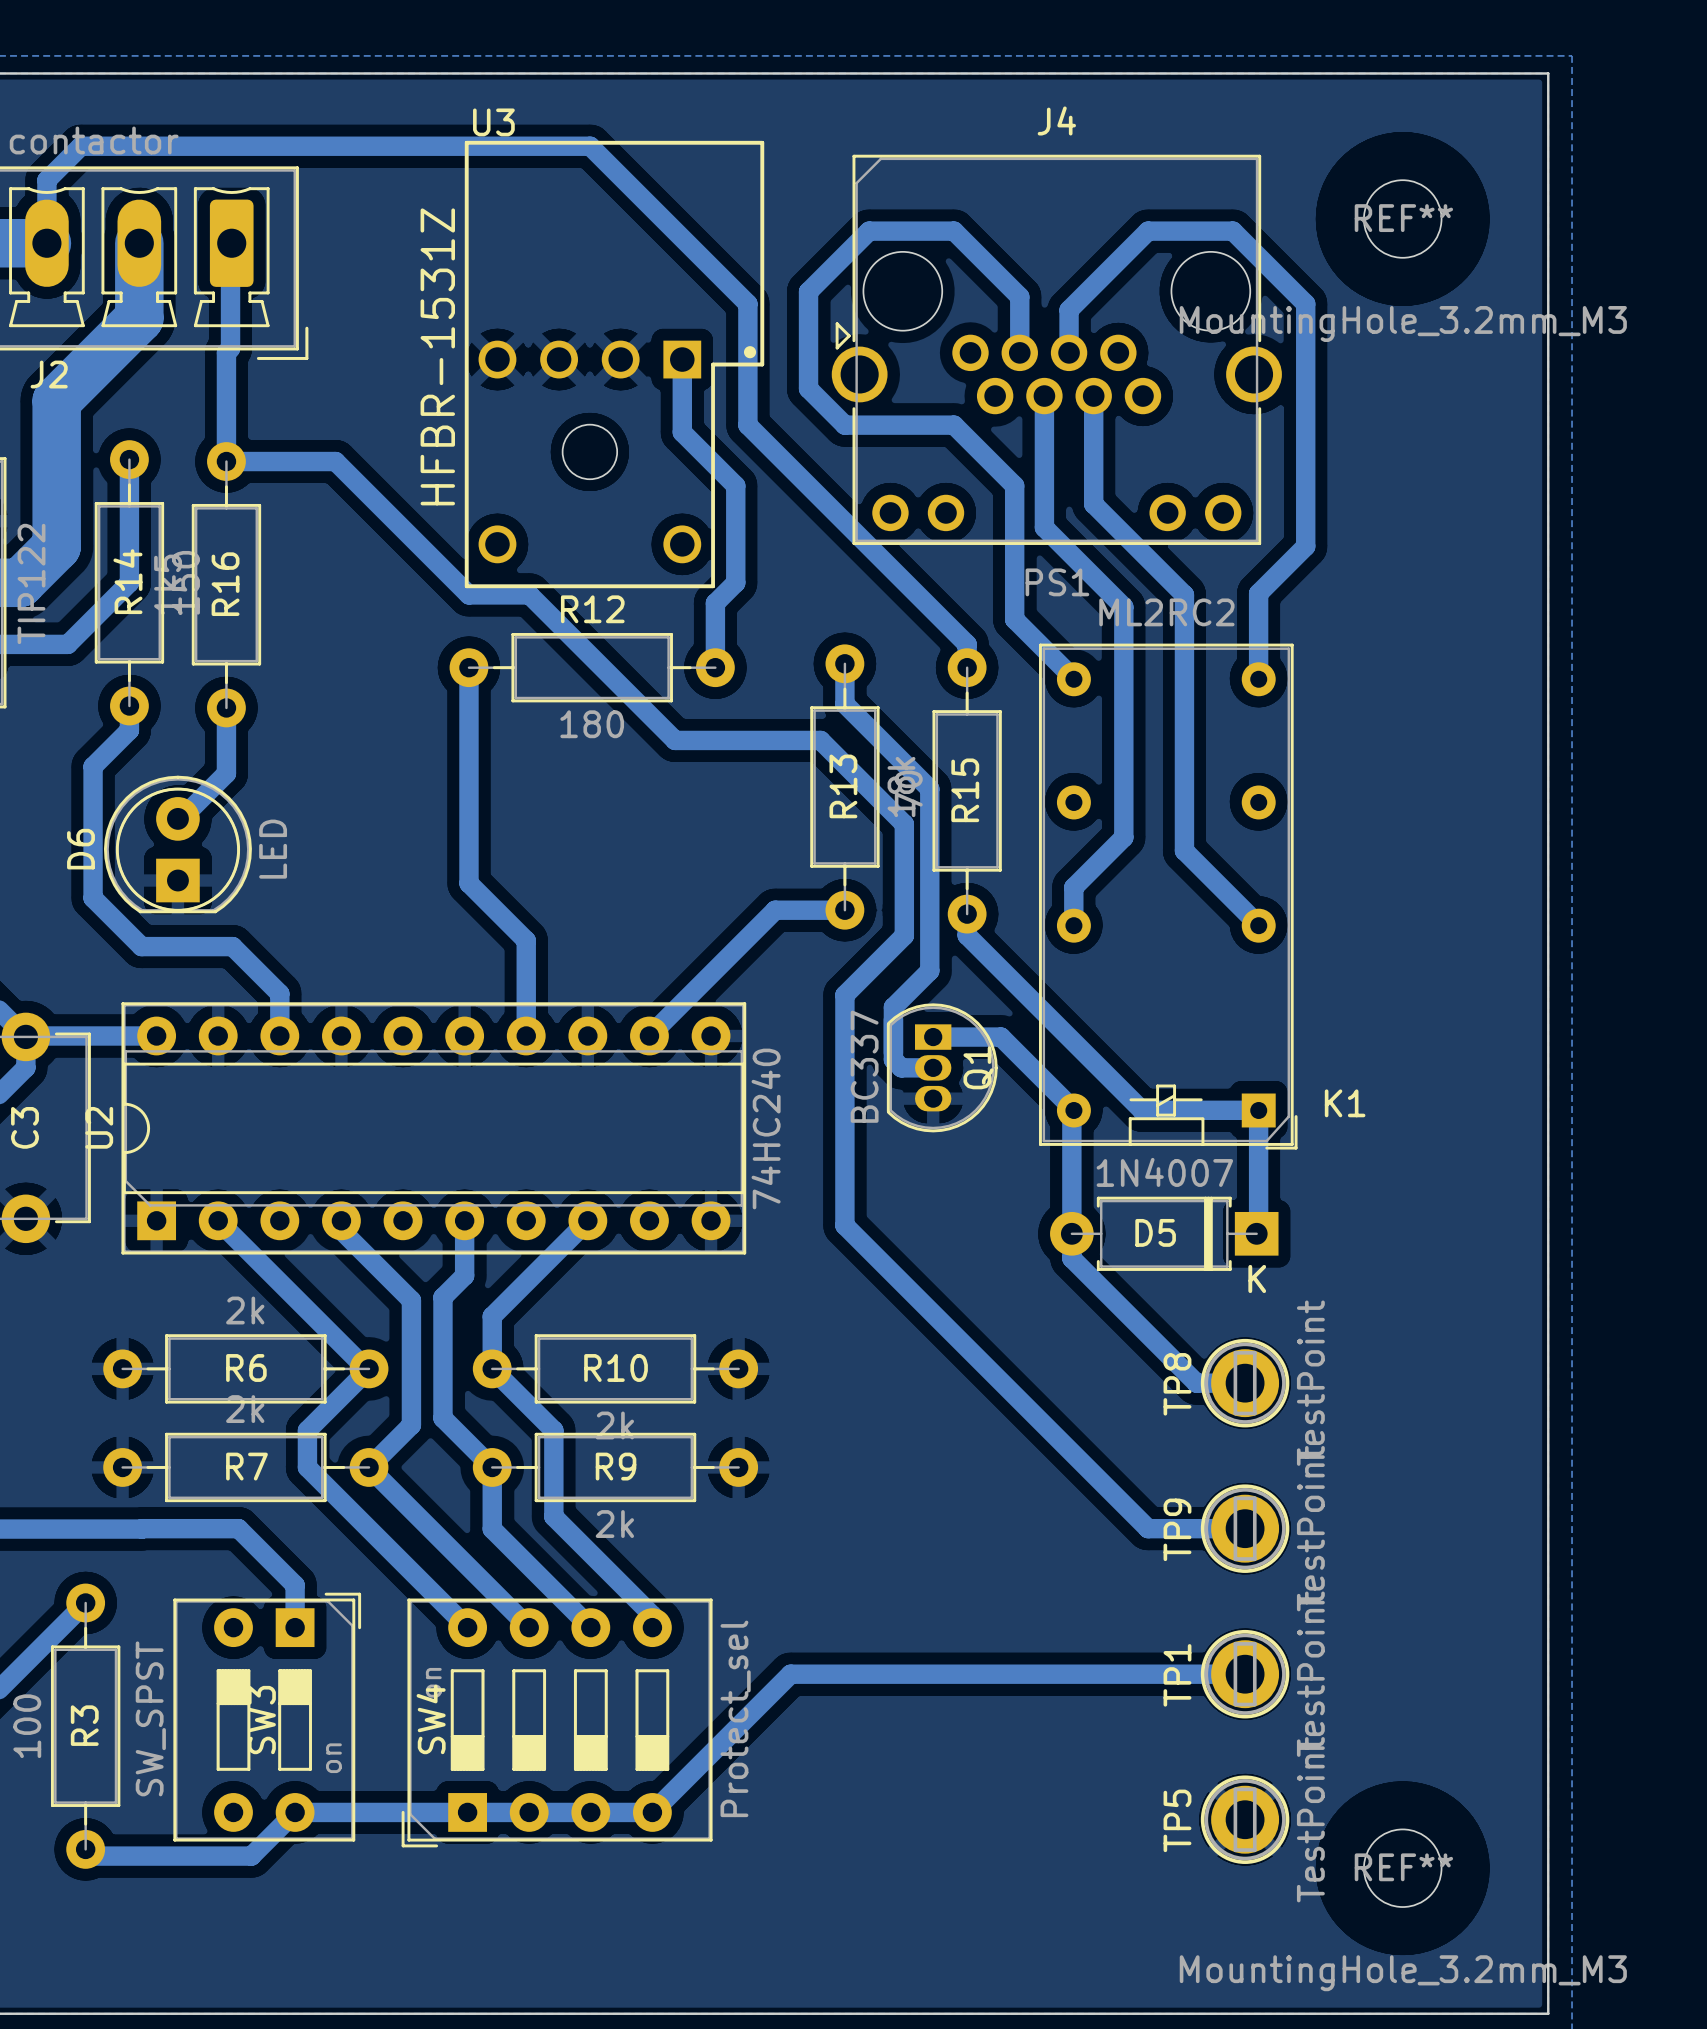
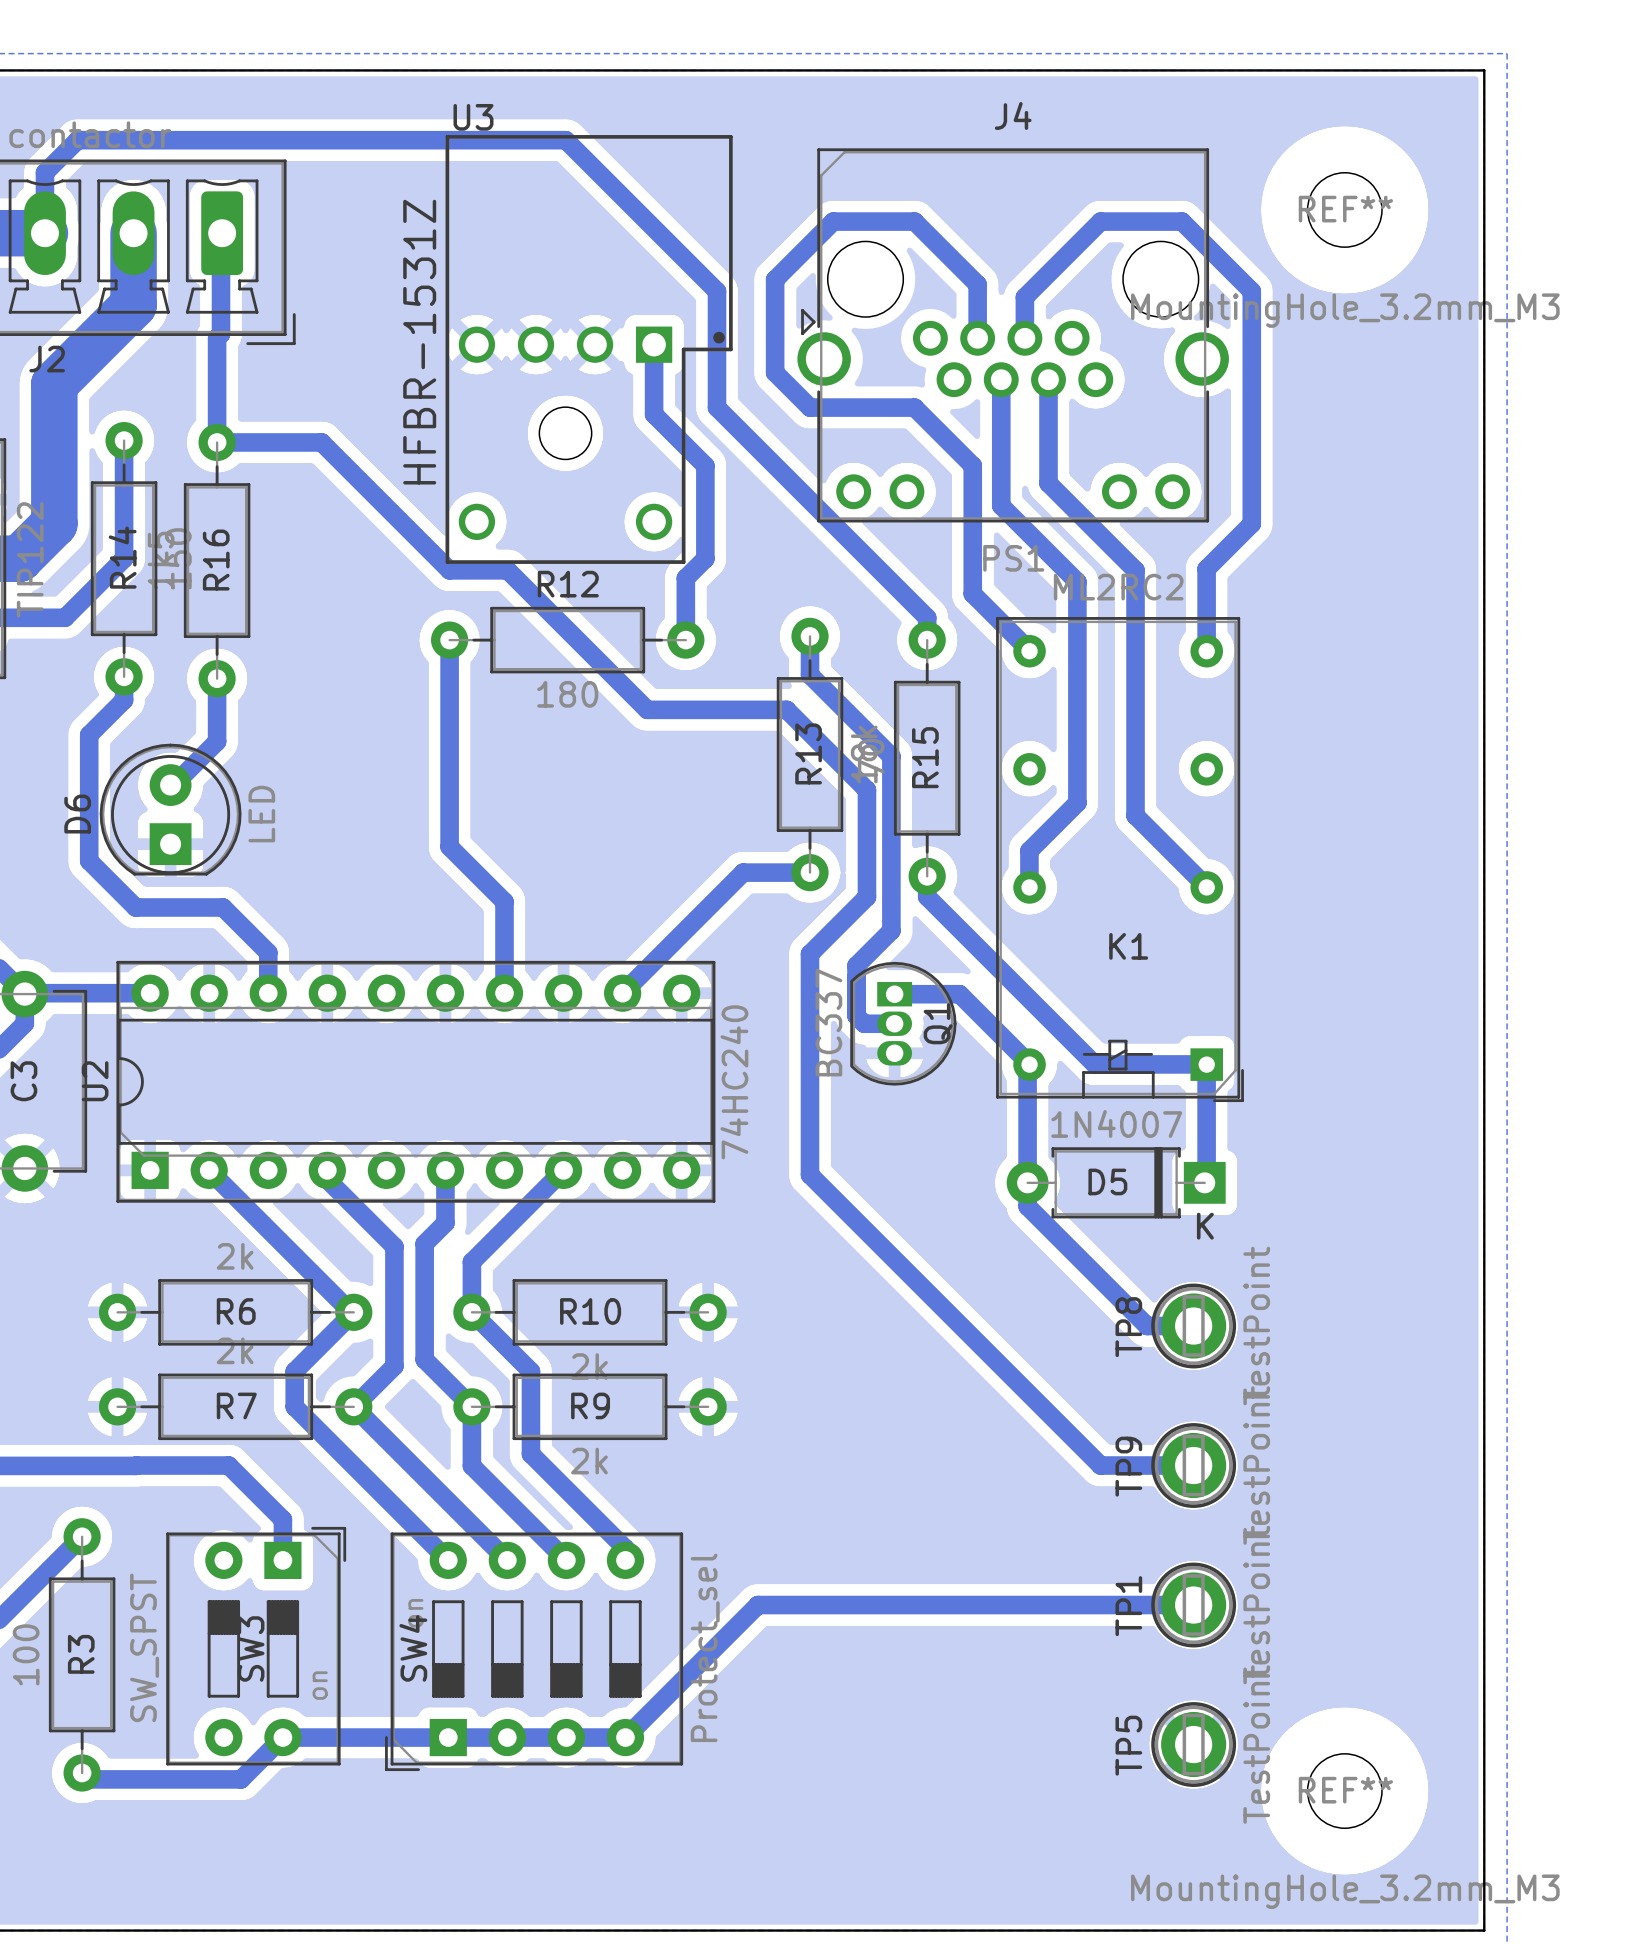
K1 name position: K1 (1345, 1103) -> K1 (1128, 946)

